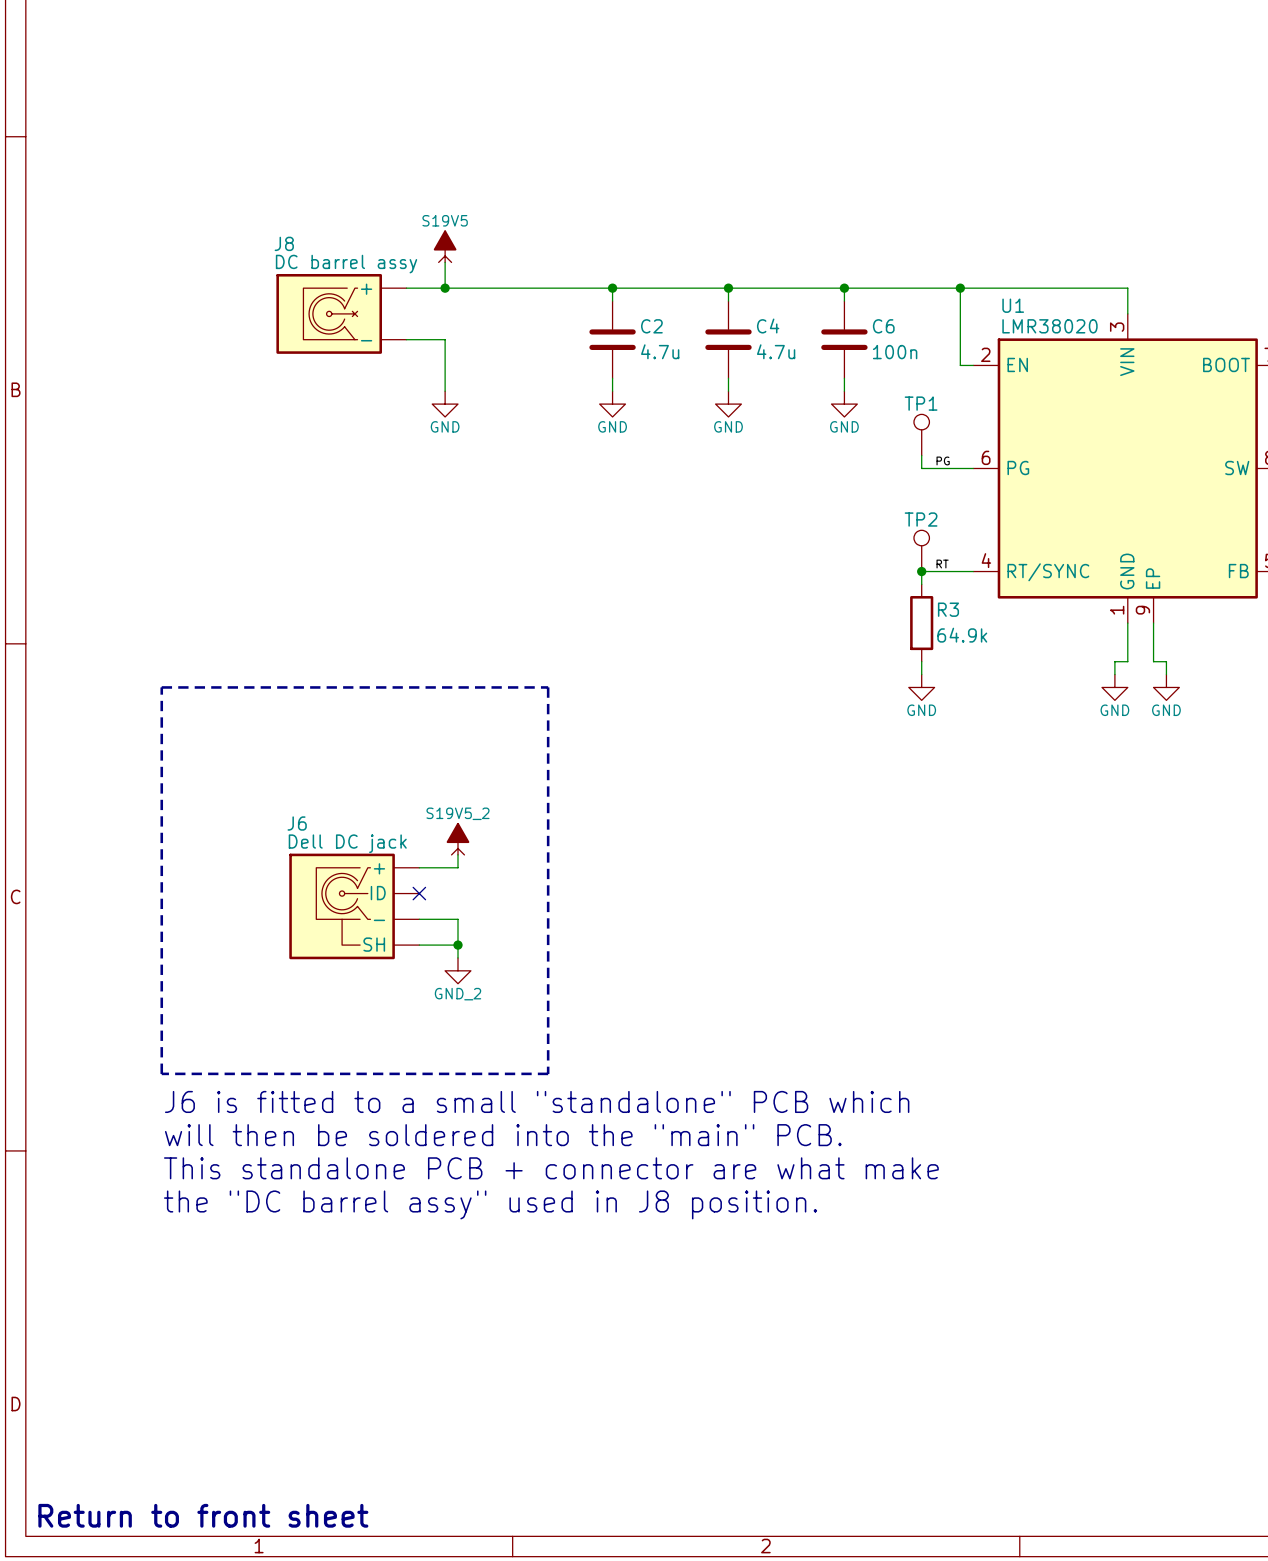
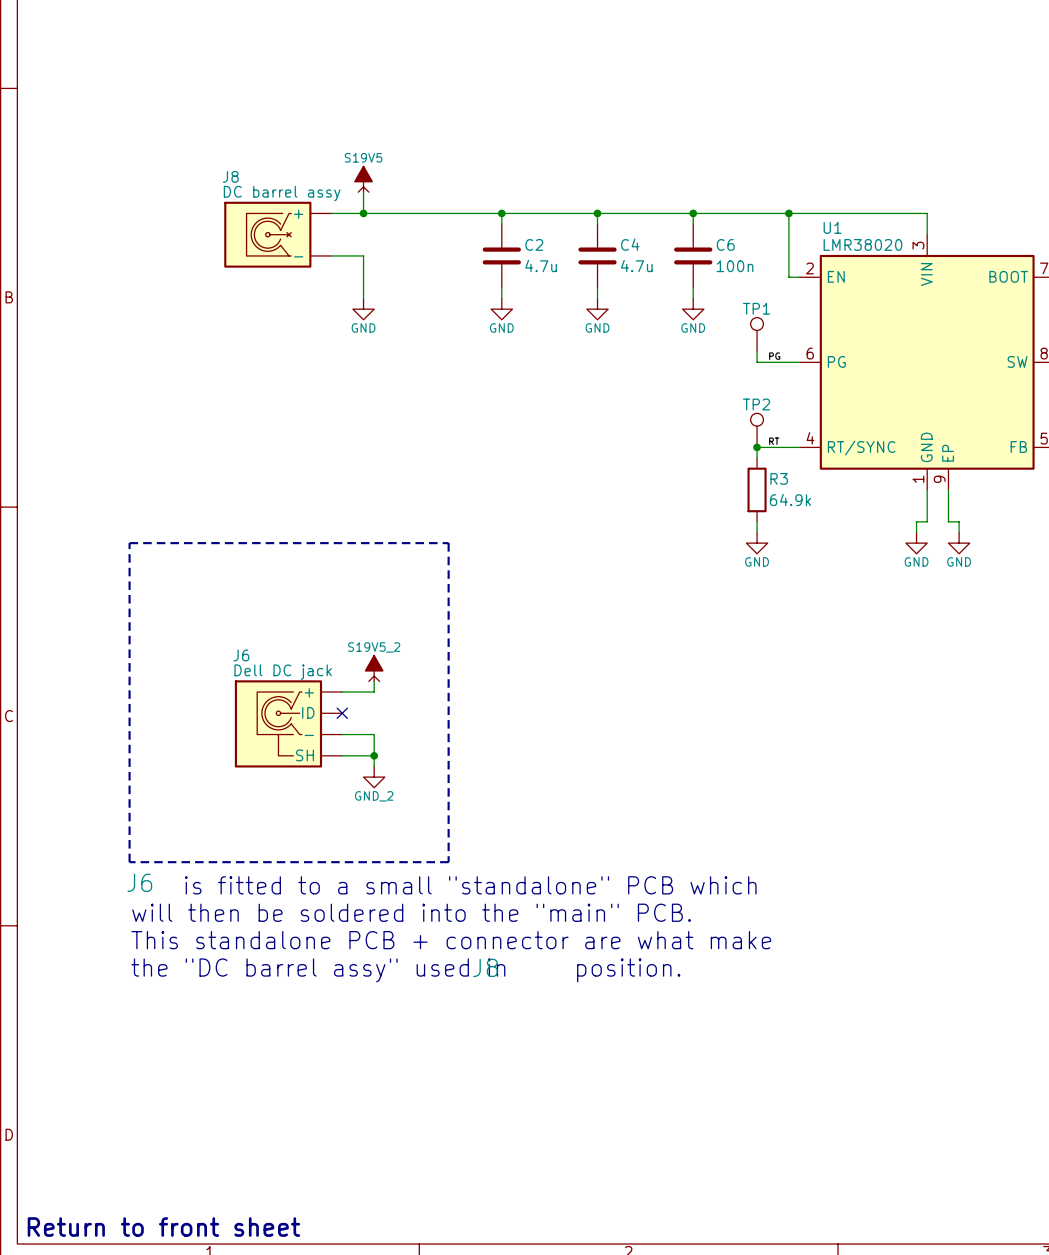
J6 text: none -> J6 (139, 882)
text: J6 is fitted to a small "standalone" PCB which (537, 1101) -> is fitted to a small "standalone" PCB which (470, 885)
J8 text: none -> J8 (485, 967)
text: the "DC barrel assy" used in J8 position. (490, 1204) -> the "DC barrel assy" used in position. (405, 970)

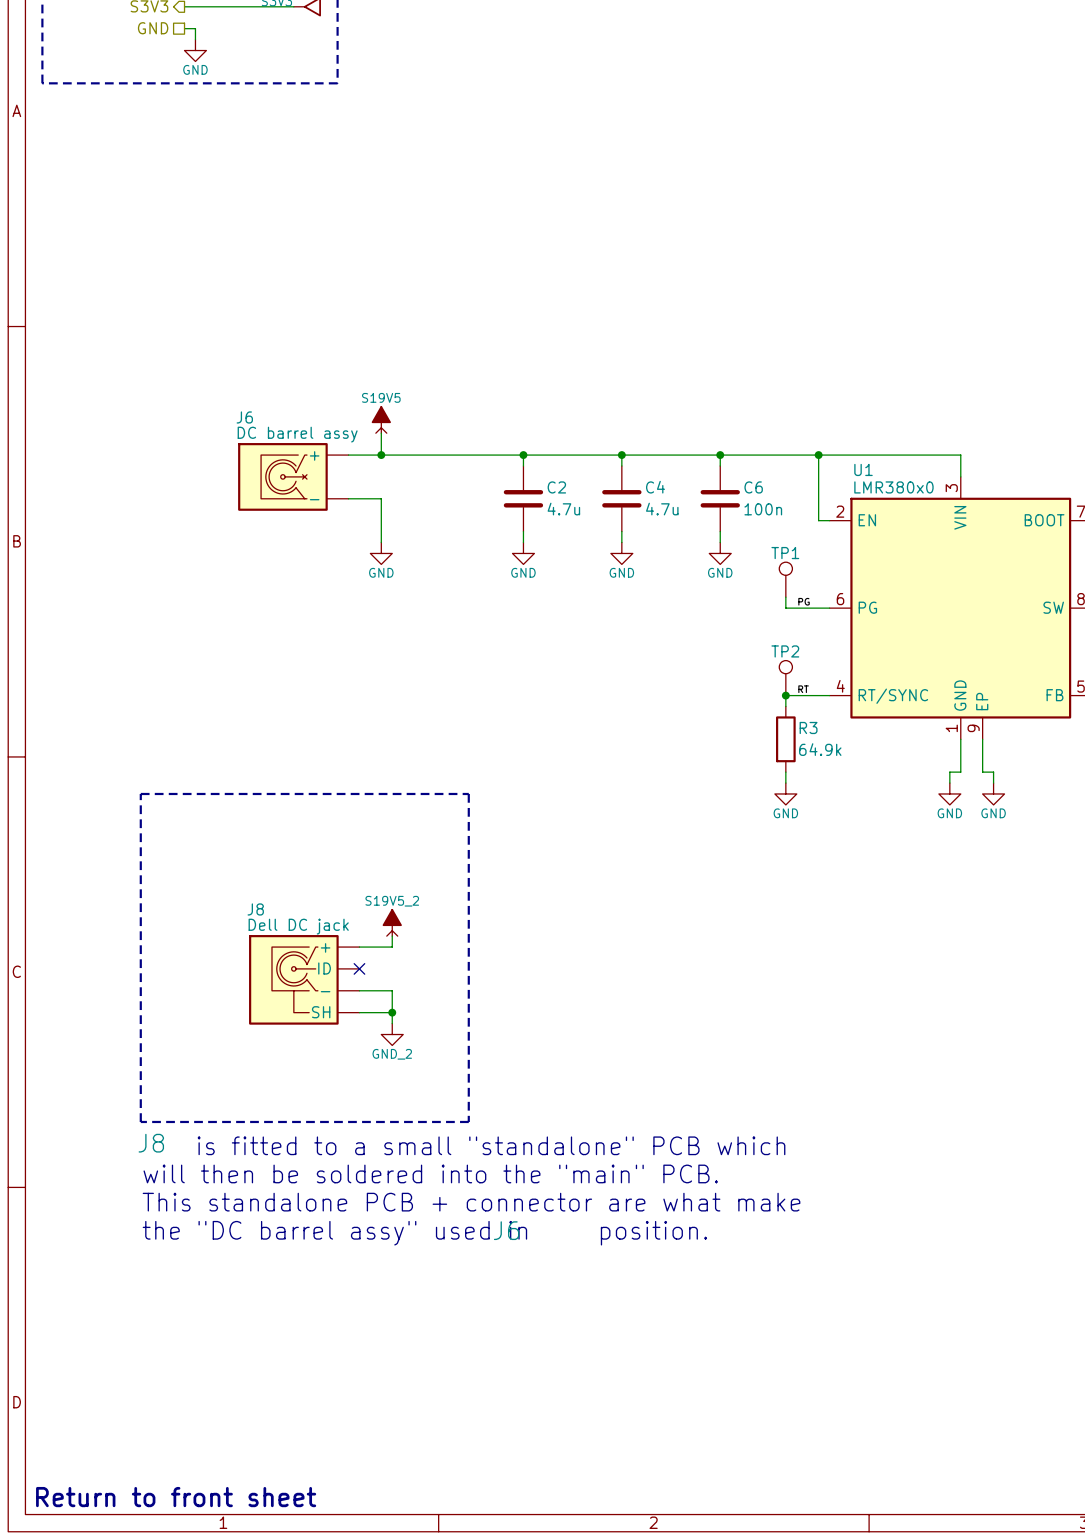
J8 name: J8 (230, 176) -> J6 (244, 417)
U1 value: LMR38020 (862, 244) -> LMR380x0 (893, 487)
J6 name: J6 (241, 655) -> J8 (255, 909)
J6 text: J6 (139, 882) -> J8 (151, 1143)
J8 text: J8 (485, 967) -> J6 (506, 1230)

